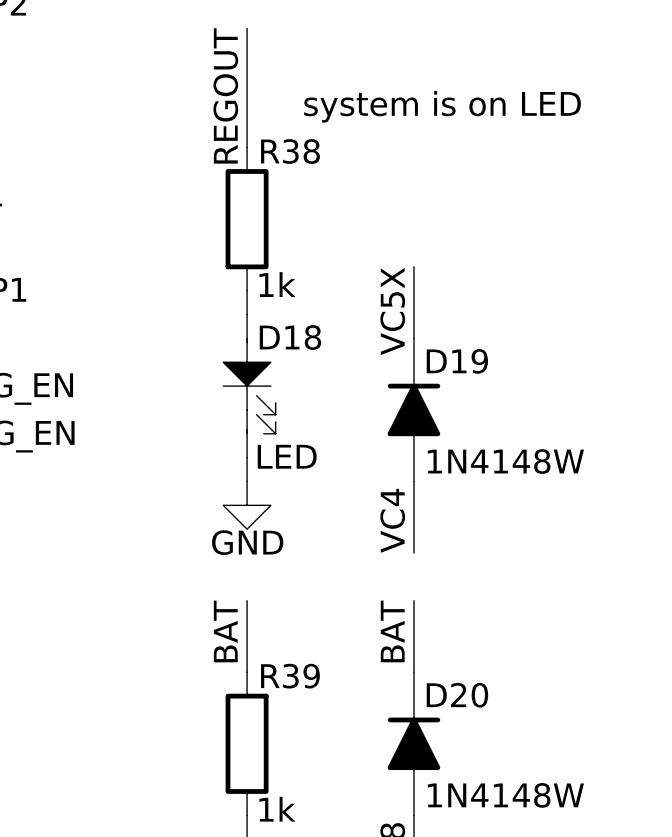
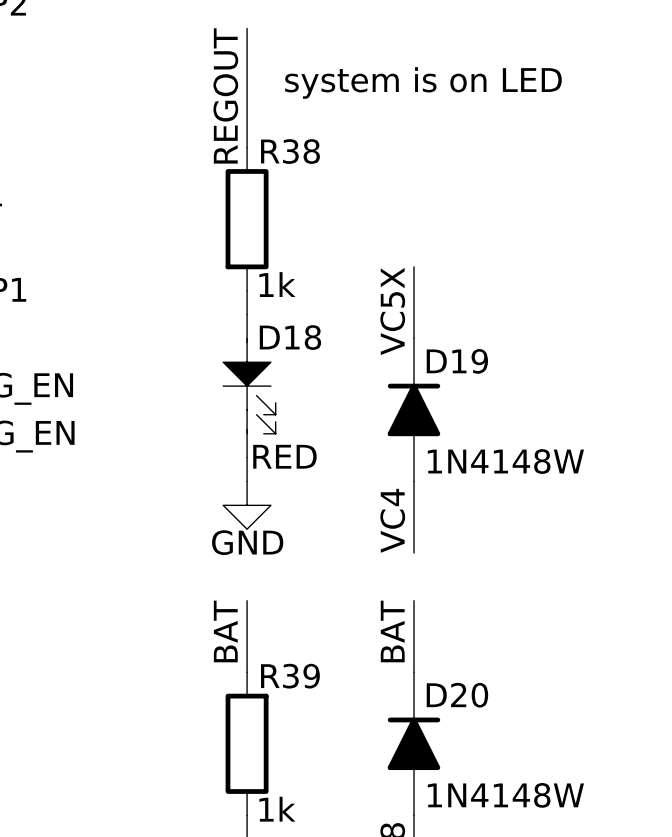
text position: system is on LED (442, 106) -> system is on LED (423, 82)
D18 value: LED (287, 456) -> RED (284, 456)

